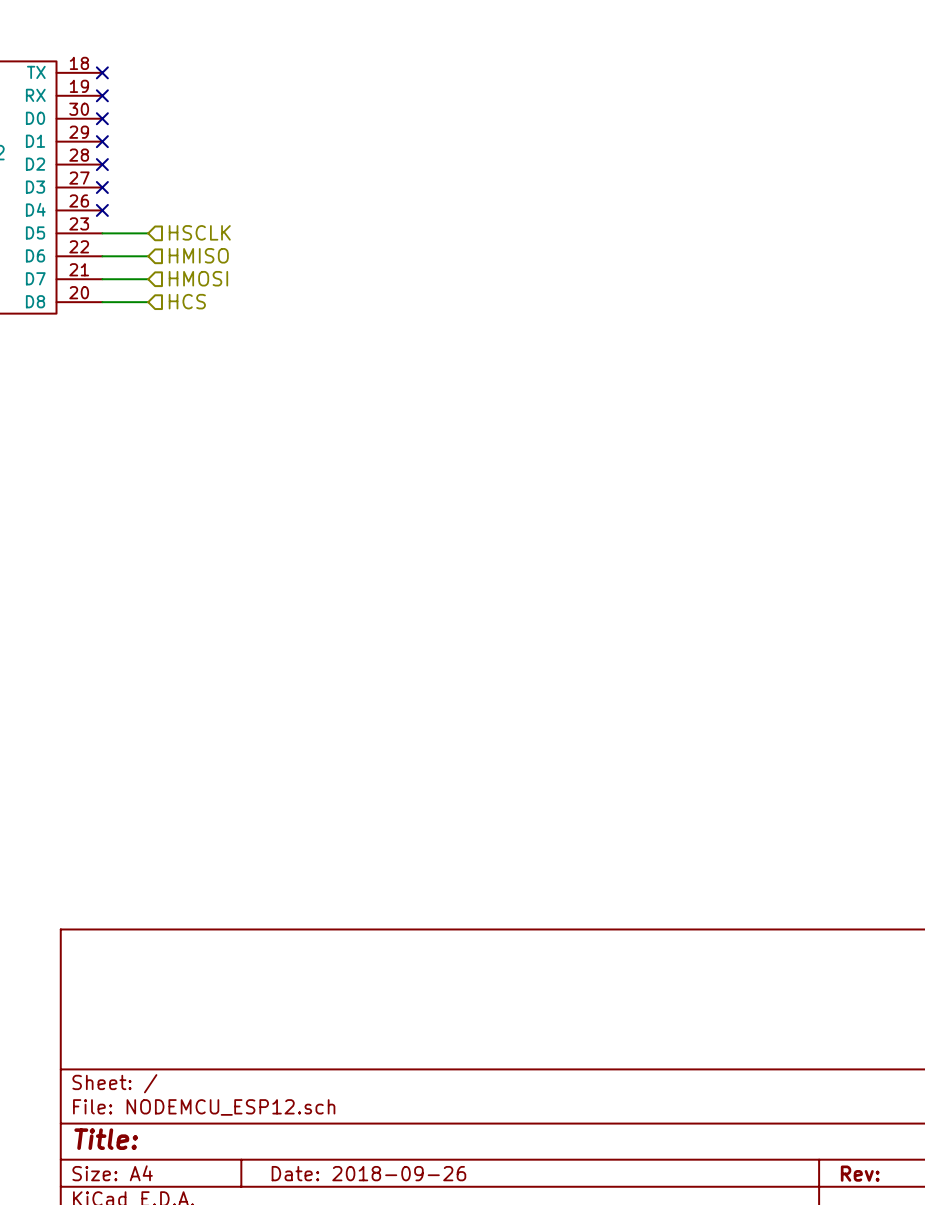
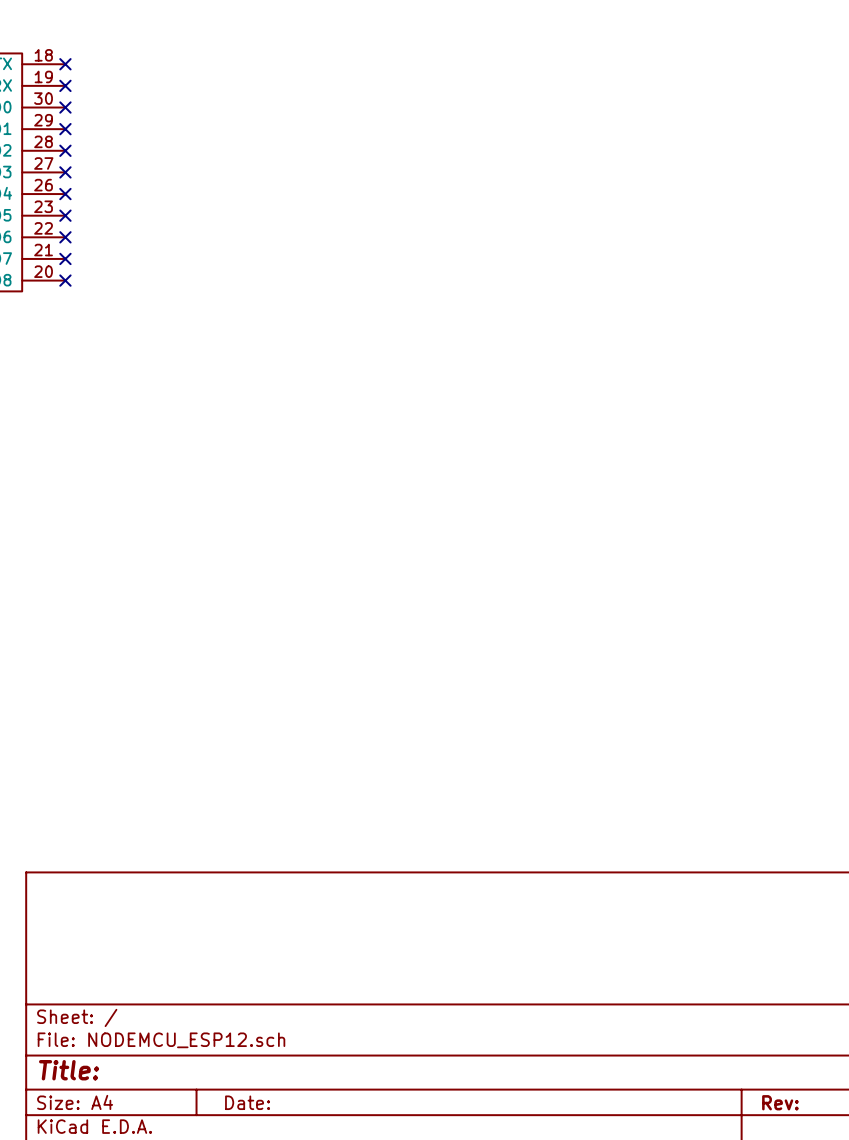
hierarchical label: HSCLK (199, 232) -> none
wire: (102, 233) (148, 233) -> none
no-connect mark: none -> (65, 215)
hierarchical label: HMISO (198, 255) -> none
wire: (102, 256) (148, 256) -> none
no-connect mark: none -> (65, 237)
hierarchical label: HMOSI (198, 278) -> none
wire: (102, 279) (148, 279) -> none
no-connect mark: none -> (65, 258)
hierarchical label: HCS (187, 301) -> none
wire: (102, 302) (148, 302) -> none
no-connect mark: none -> (65, 280)
title block: Date: 2018-09-26 (368, 1173) -> Date: (247, 1102)

